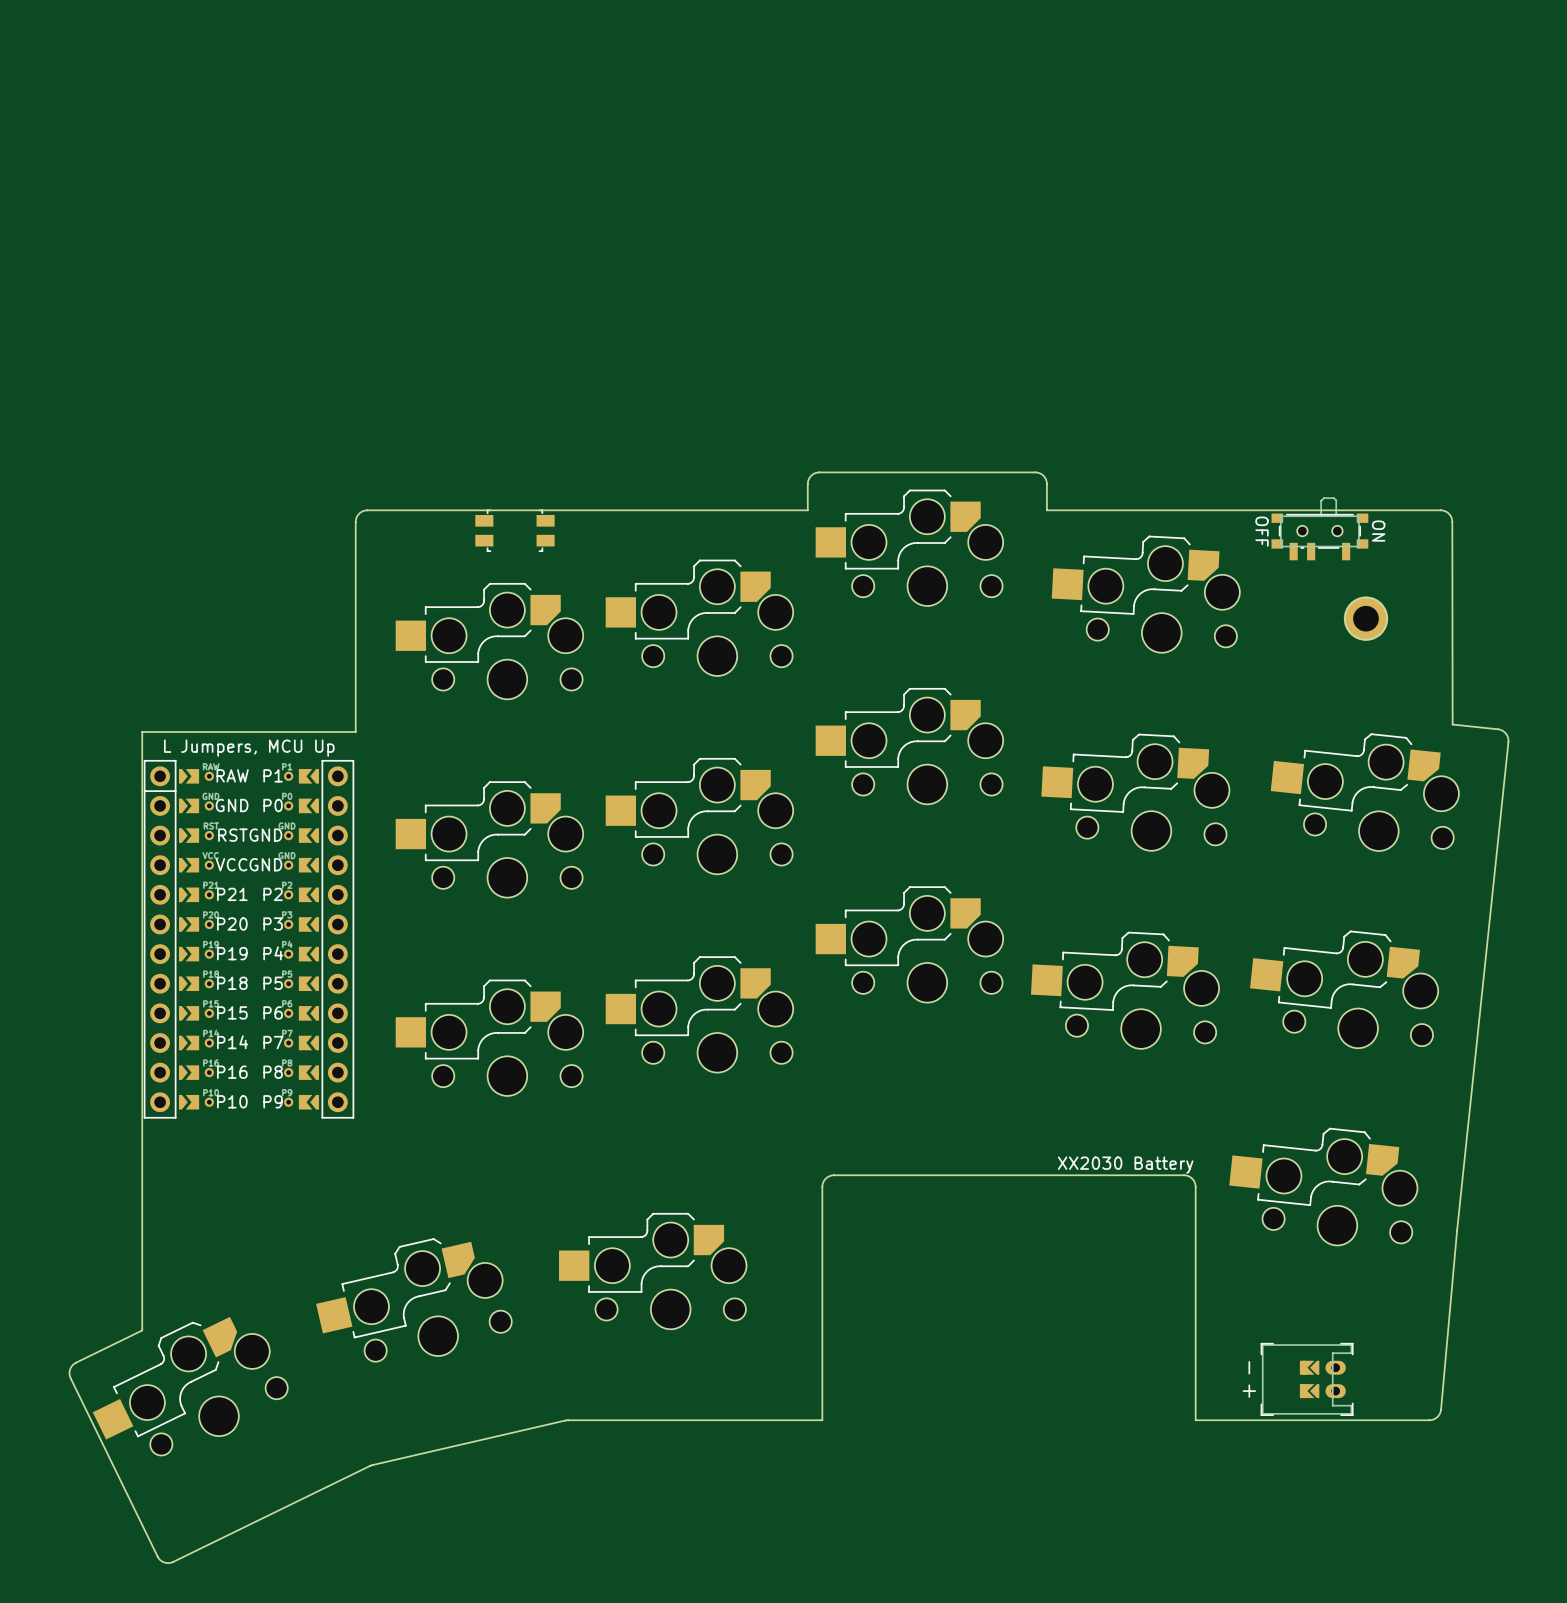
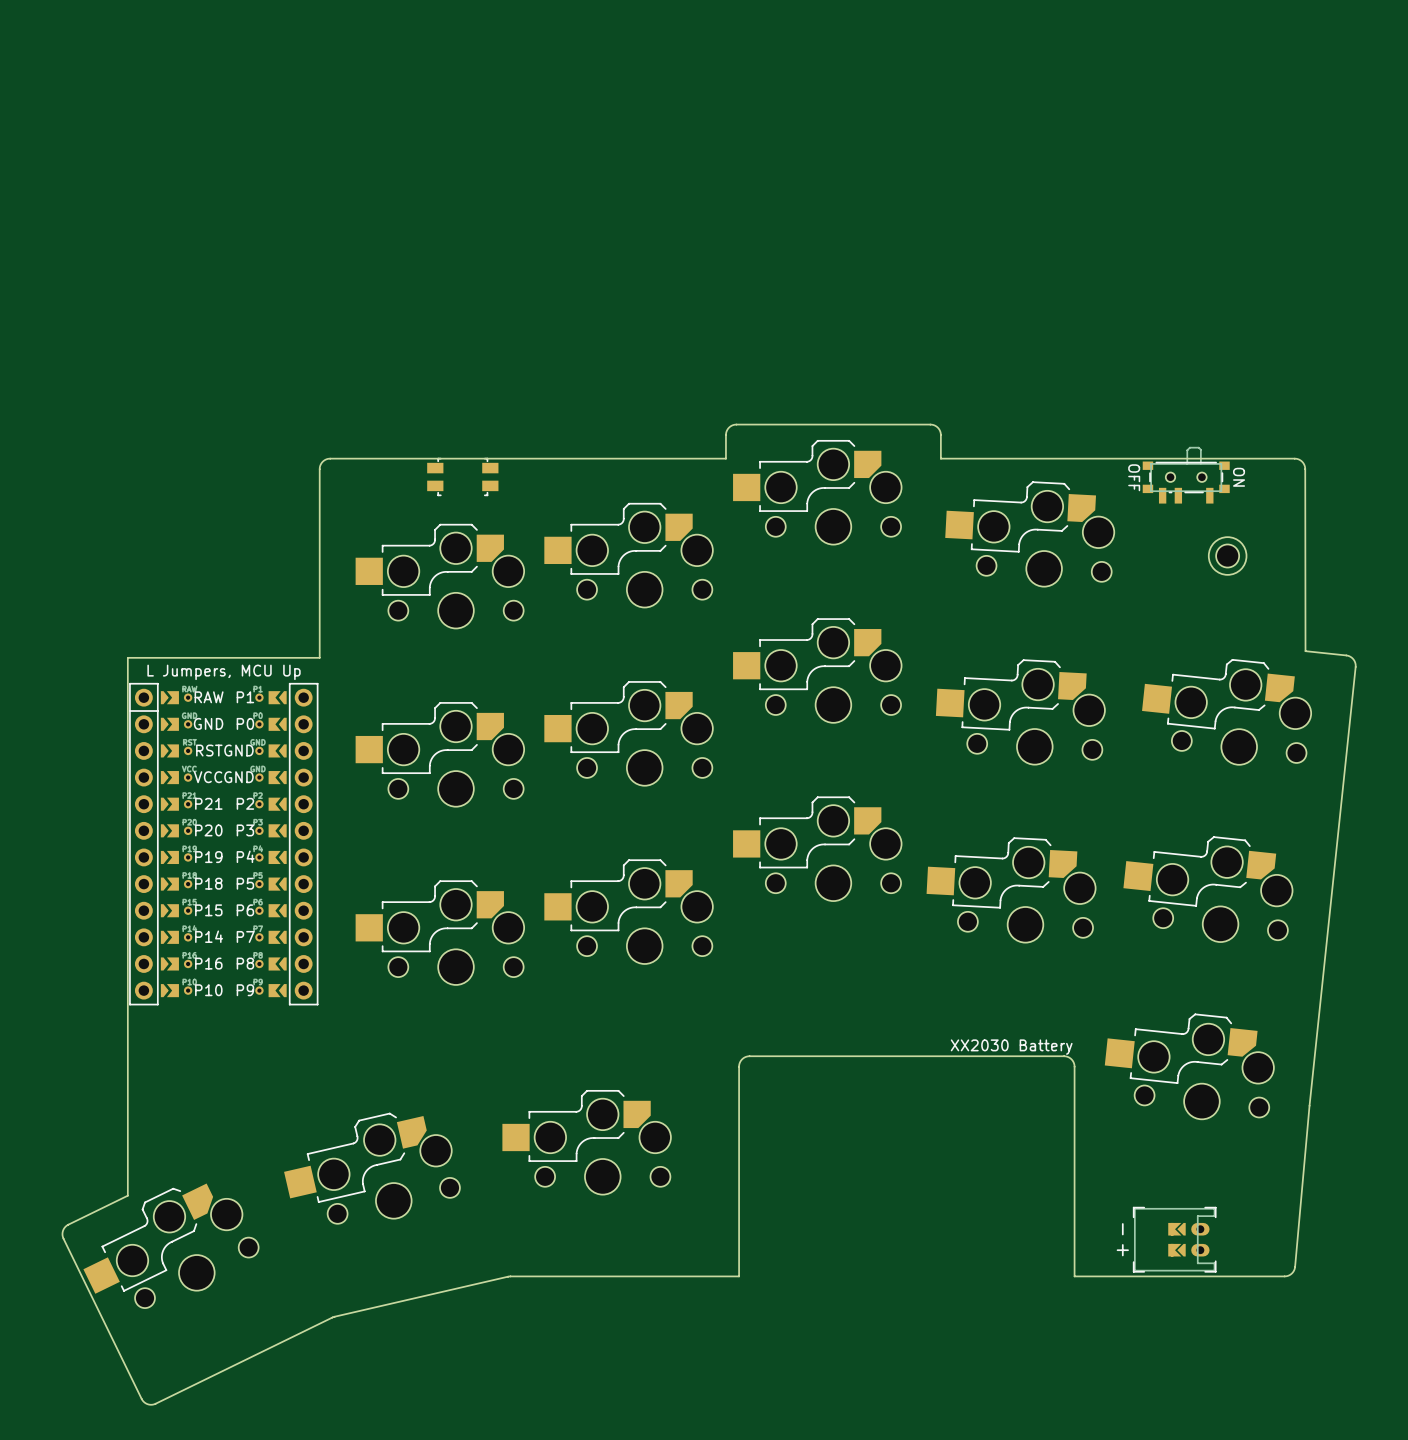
part footprint: [1343, 596, 1389, 641] -> [1216, 544, 1240, 568]

